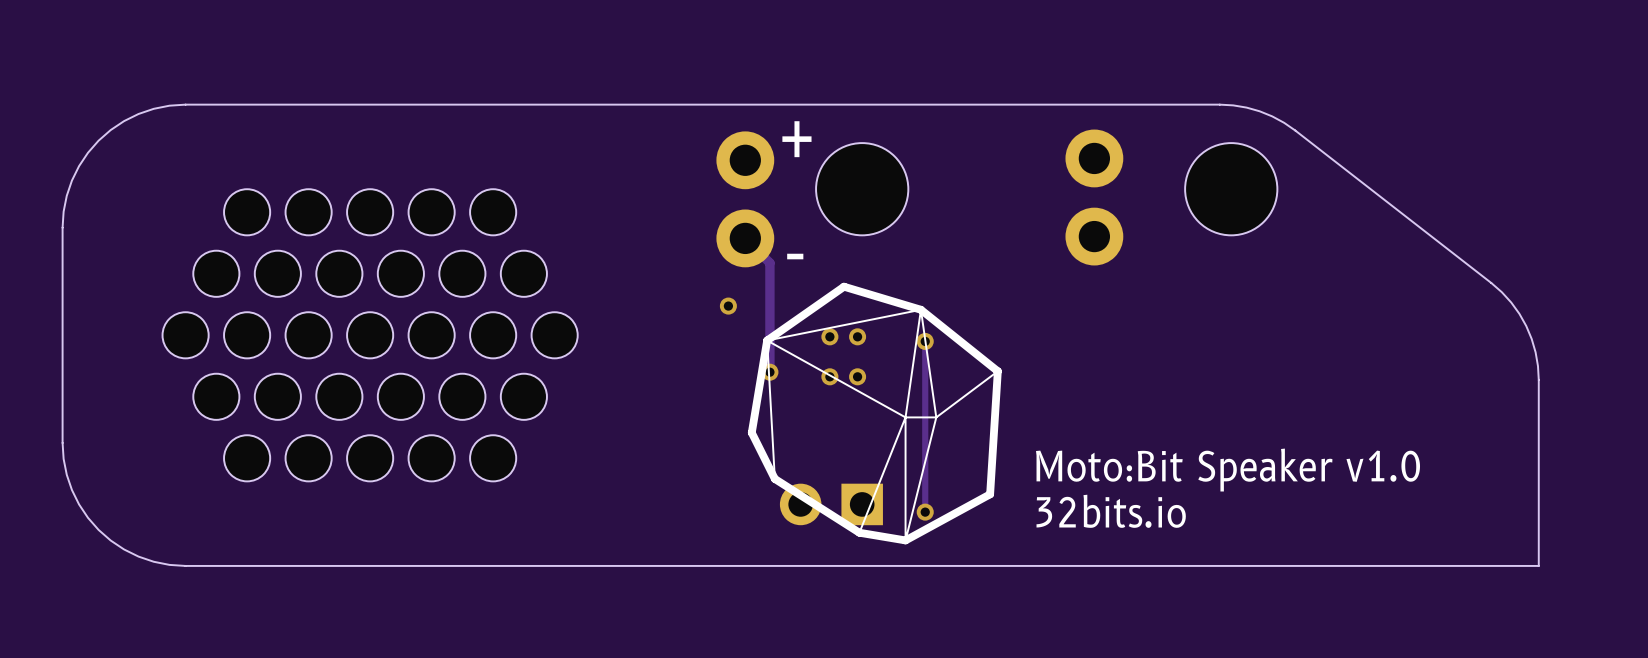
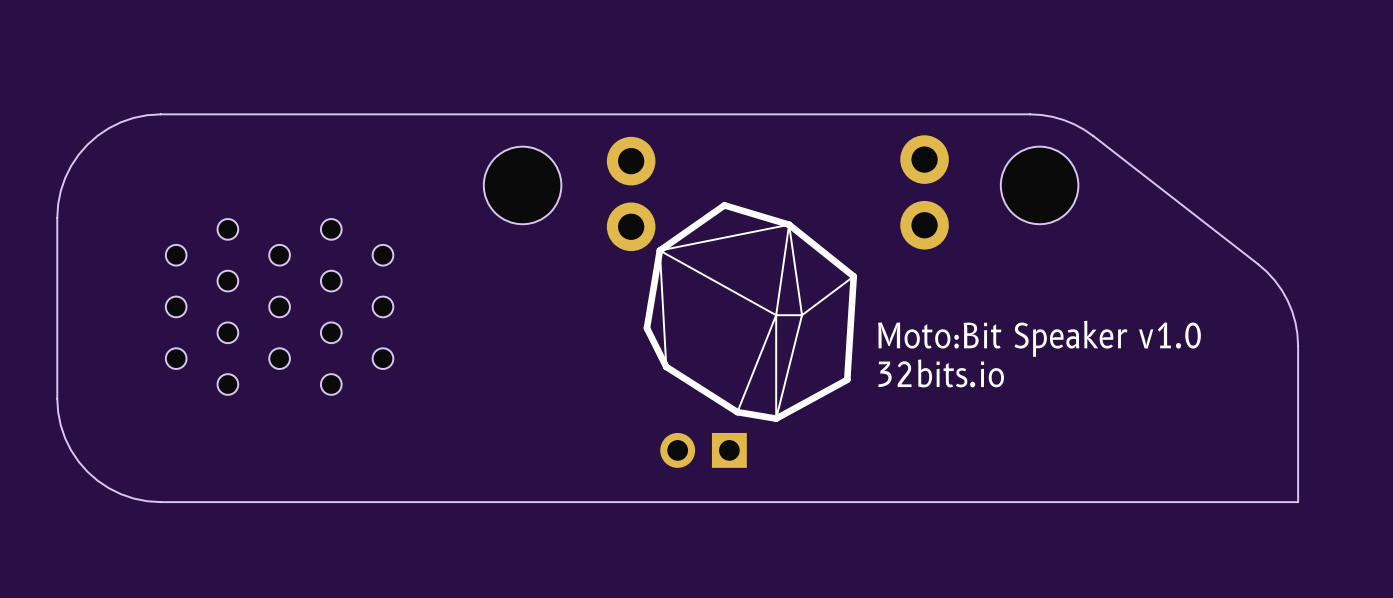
text: + (796, 139) -> none
hole position: (862, 189) -> (522, 185)
hole: (247, 212) -> none
hole: (308, 212) -> none
hole: (370, 212) -> none
hole: (431, 212) -> none
hole: (493, 212) -> none
track: (745, 238) (769, 263) (769, 372) -> none
hole: none -> (227, 229)
hole: none -> (331, 229)
hole size: [193, 250, 240, 297] -> [165, 244, 187, 266]
hole size: [316, 250, 363, 297] -> [269, 244, 290, 266]
hole size: [439, 250, 486, 297] -> [372, 244, 394, 266]
text: - (795, 256) -> none
hole: (277, 273) -> none
hole: (400, 273) -> none
hole: (523, 273) -> none
hole: none -> (227, 281)
hole: none -> (331, 281)
via: (728, 306) -> none
hole size: [162, 312, 209, 359] -> [165, 296, 187, 318]
hole size: [285, 312, 332, 359] -> [269, 296, 290, 318]
hole size: [408, 312, 455, 359] -> [372, 296, 394, 318]
hole: (247, 335) -> none
hole: (370, 335) -> none
hole: (493, 335) -> none
hole: (554, 335) -> none
via: (829, 336) -> none
via: (857, 336) -> none
track: (925, 341) (925, 512) -> none
via: (925, 341) -> none
hole: none -> (227, 332)
hole: none -> (331, 332)
via: (769, 372) -> none
hole size: [193, 373, 240, 420] -> [165, 348, 187, 369]
hole size: [316, 373, 363, 420] -> [269, 348, 290, 369]
hole size: [439, 373, 486, 420] -> [372, 348, 394, 369]
via: (829, 376) -> none
via: (857, 376) -> none
hole: (277, 396) -> none
hole: (400, 396) -> none
hole: (523, 396) -> none
drawing position: (874, 413) -> (750, 311)
hole: none -> (227, 384)
hole: none -> (331, 384)
hole: (247, 458) -> none
hole: (308, 458) -> none
hole: (370, 458) -> none
hole: (431, 458) -> none
hole: (493, 458) -> none
text position: Moto:Bit Speaker v1.0 (1228, 470) -> Moto:Bit Speaker v1.0 (1039, 338)
text position: 32bits.io (1111, 511) -> 32bits.io (941, 373)
via: (925, 512) -> none

